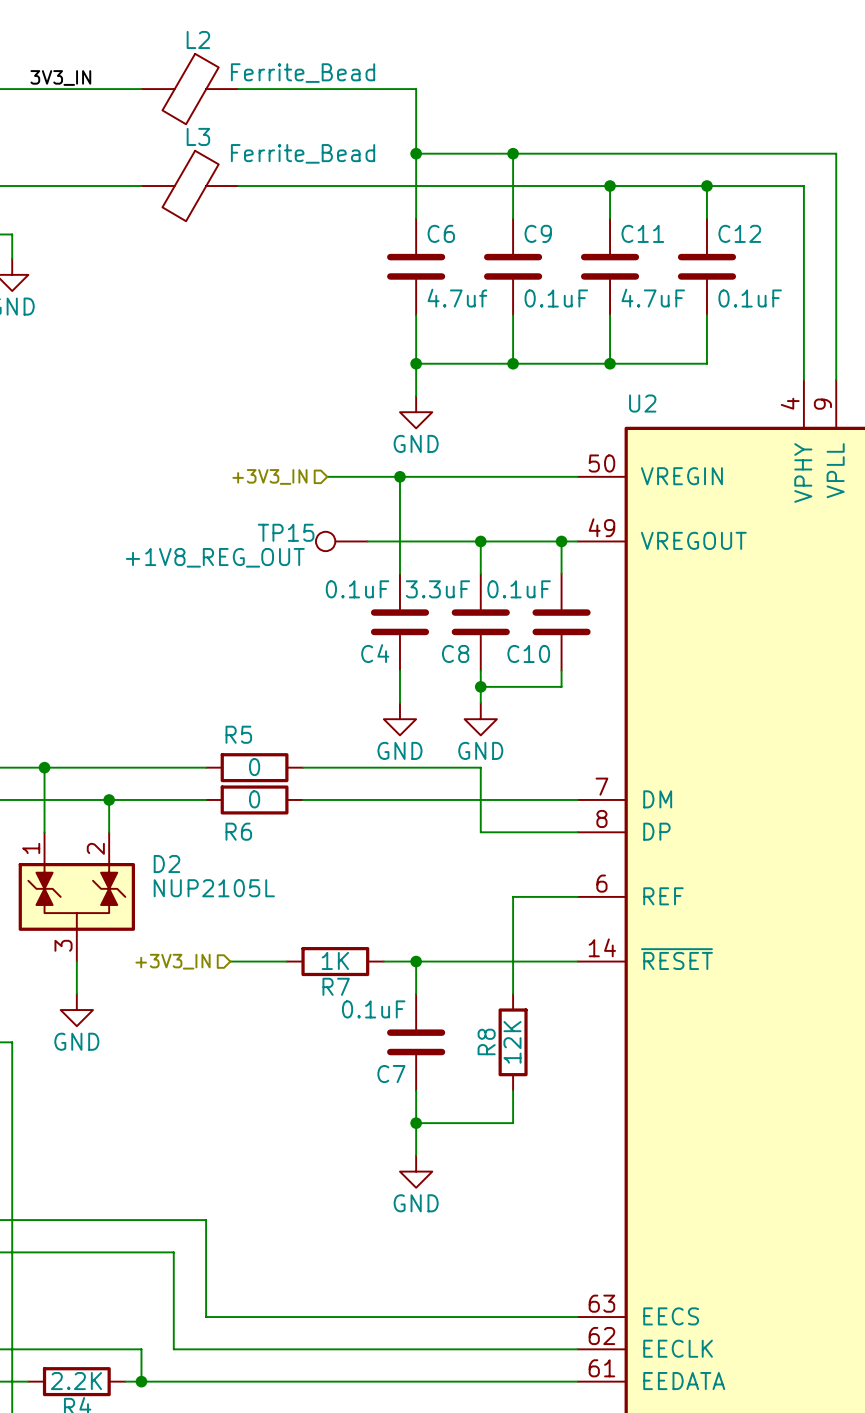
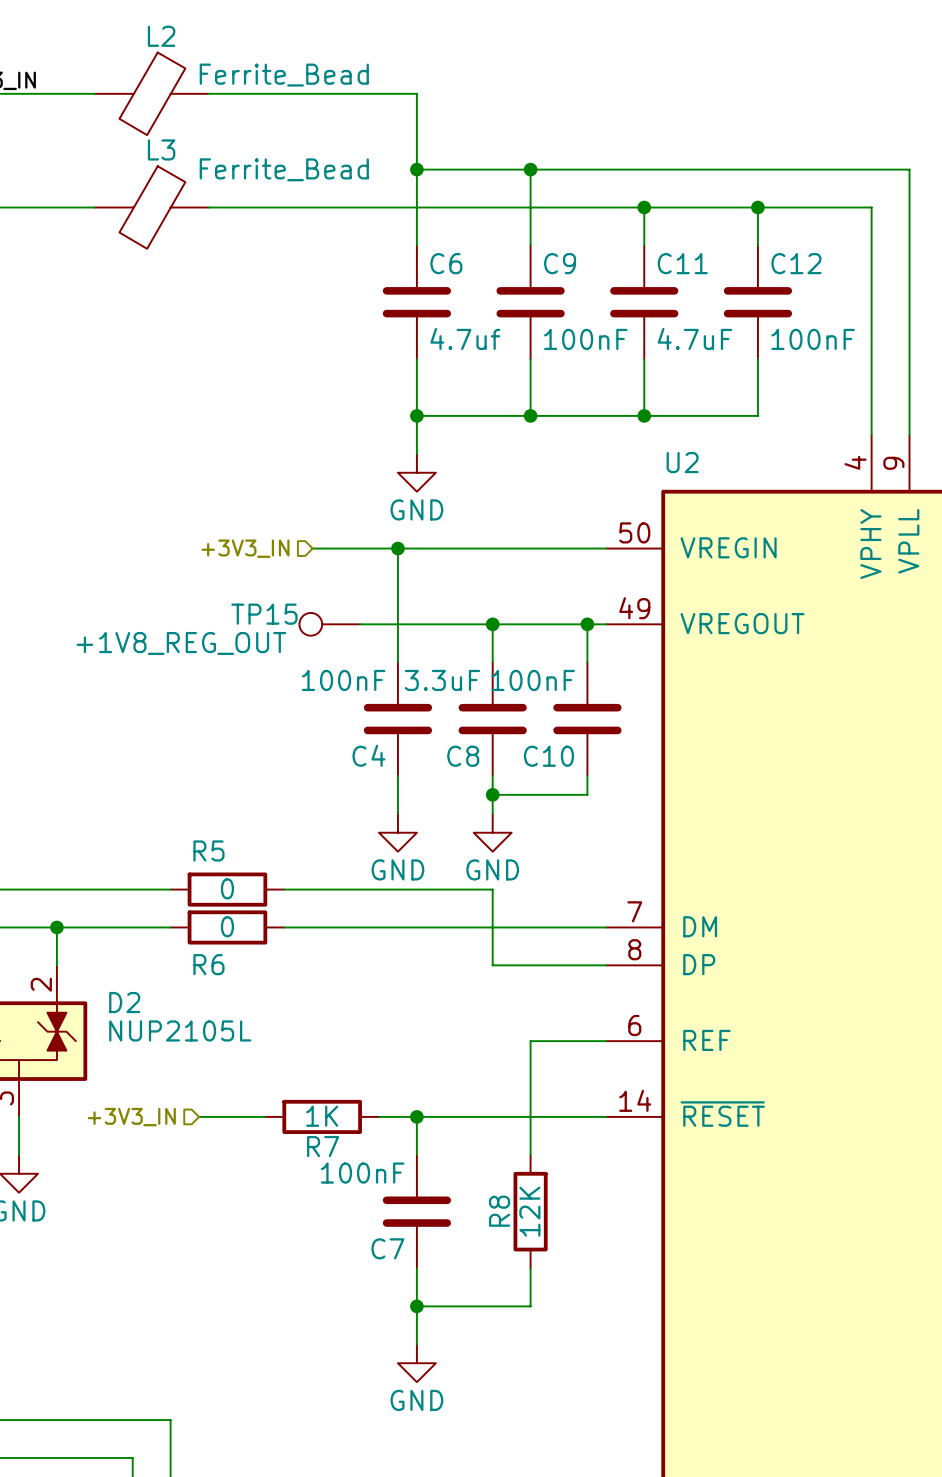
C9 value: 0.1uF (556, 298) -> 100nF (585, 339)
C12 value: 0.1uF (750, 298) -> 100nF (813, 339)
C4 value: 0.1uF (357, 589) -> 100nF (343, 680)
C10 value: 0.1uF (519, 589) -> 100nF (533, 680)
C7 value: 0.1uF (373, 1009) -> 100nF (362, 1173)

